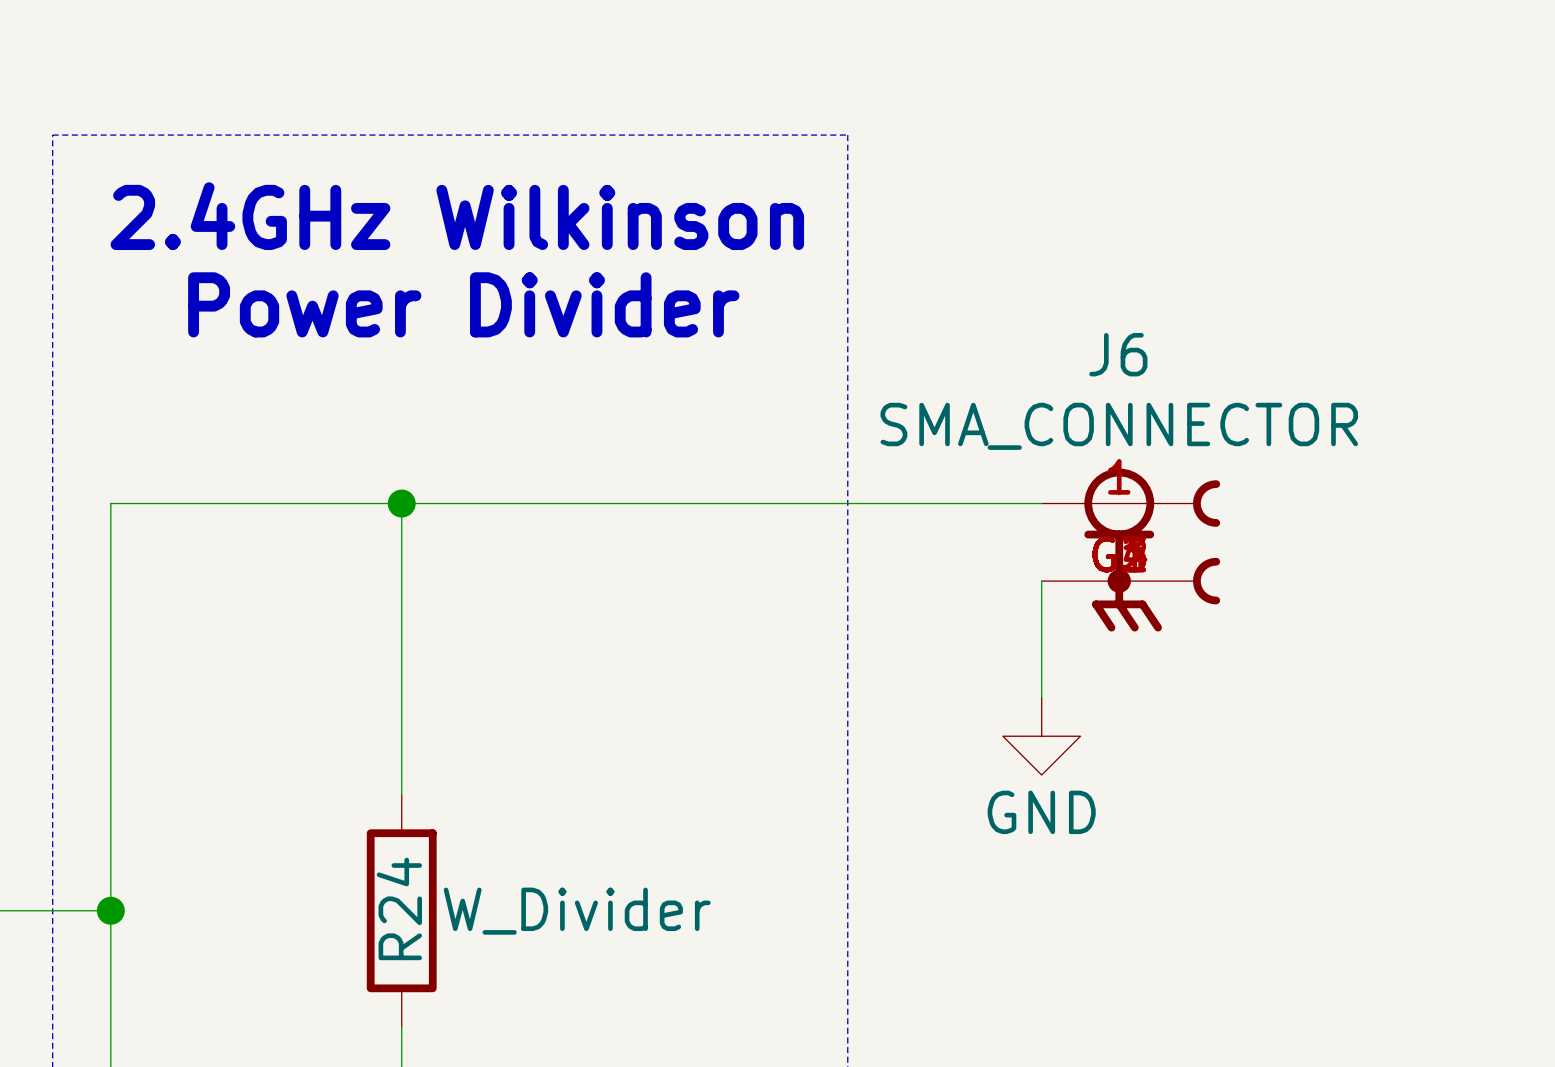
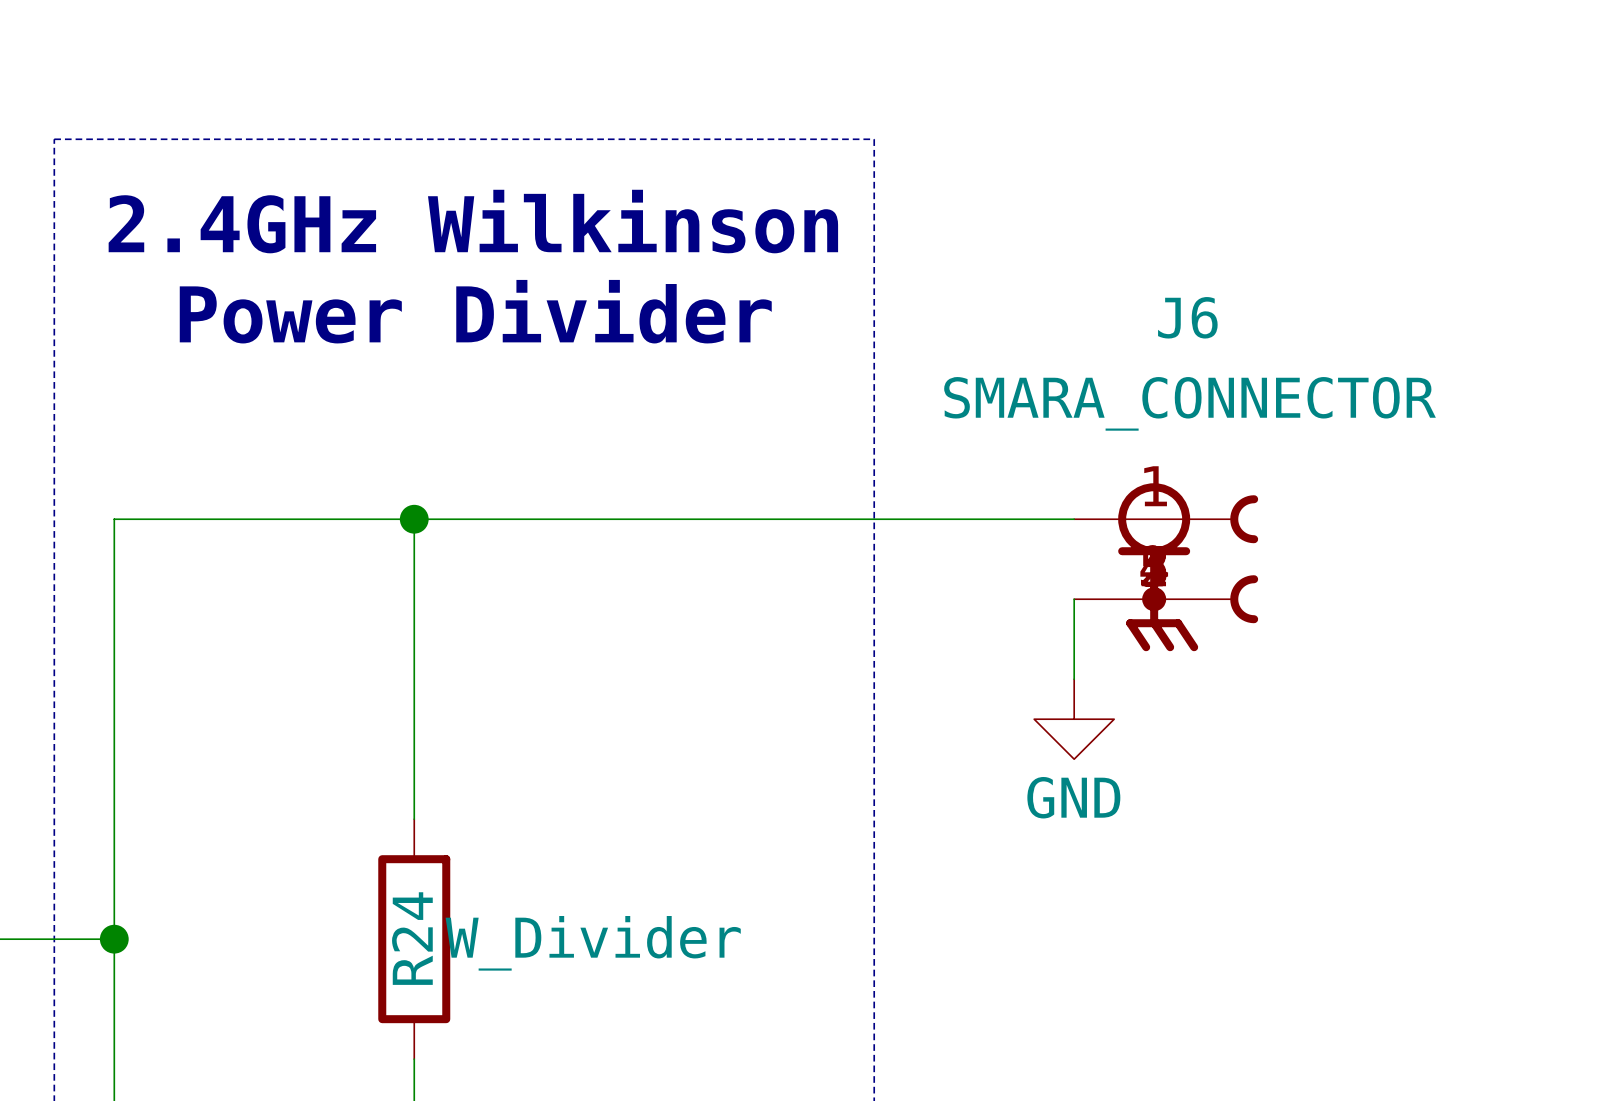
J6 value: SMA_CONNECTOR (1119, 426) -> SMARA_CONNECTOR (1190, 403)
J6 symbol: [1041, 468, 1221, 632] -> [1074, 483, 1259, 652]
power symbol position: GND (1041, 736) -> GND (1074, 719)

